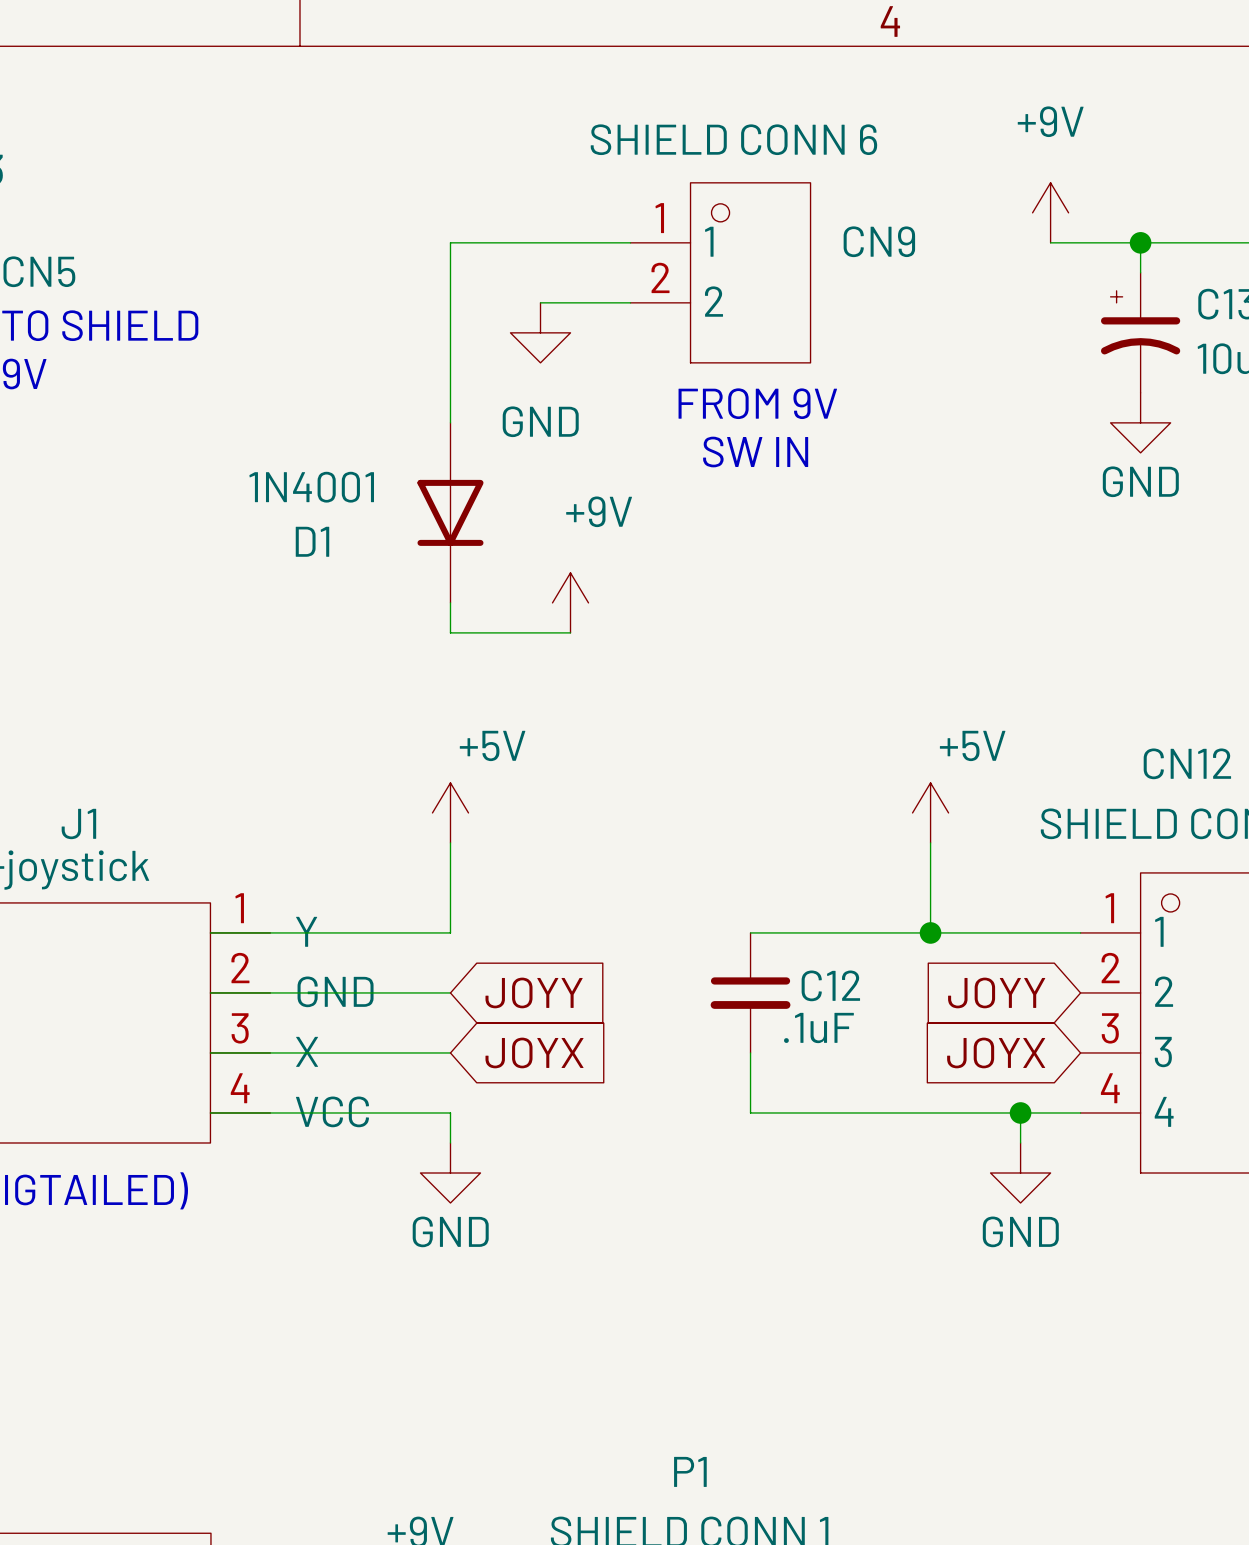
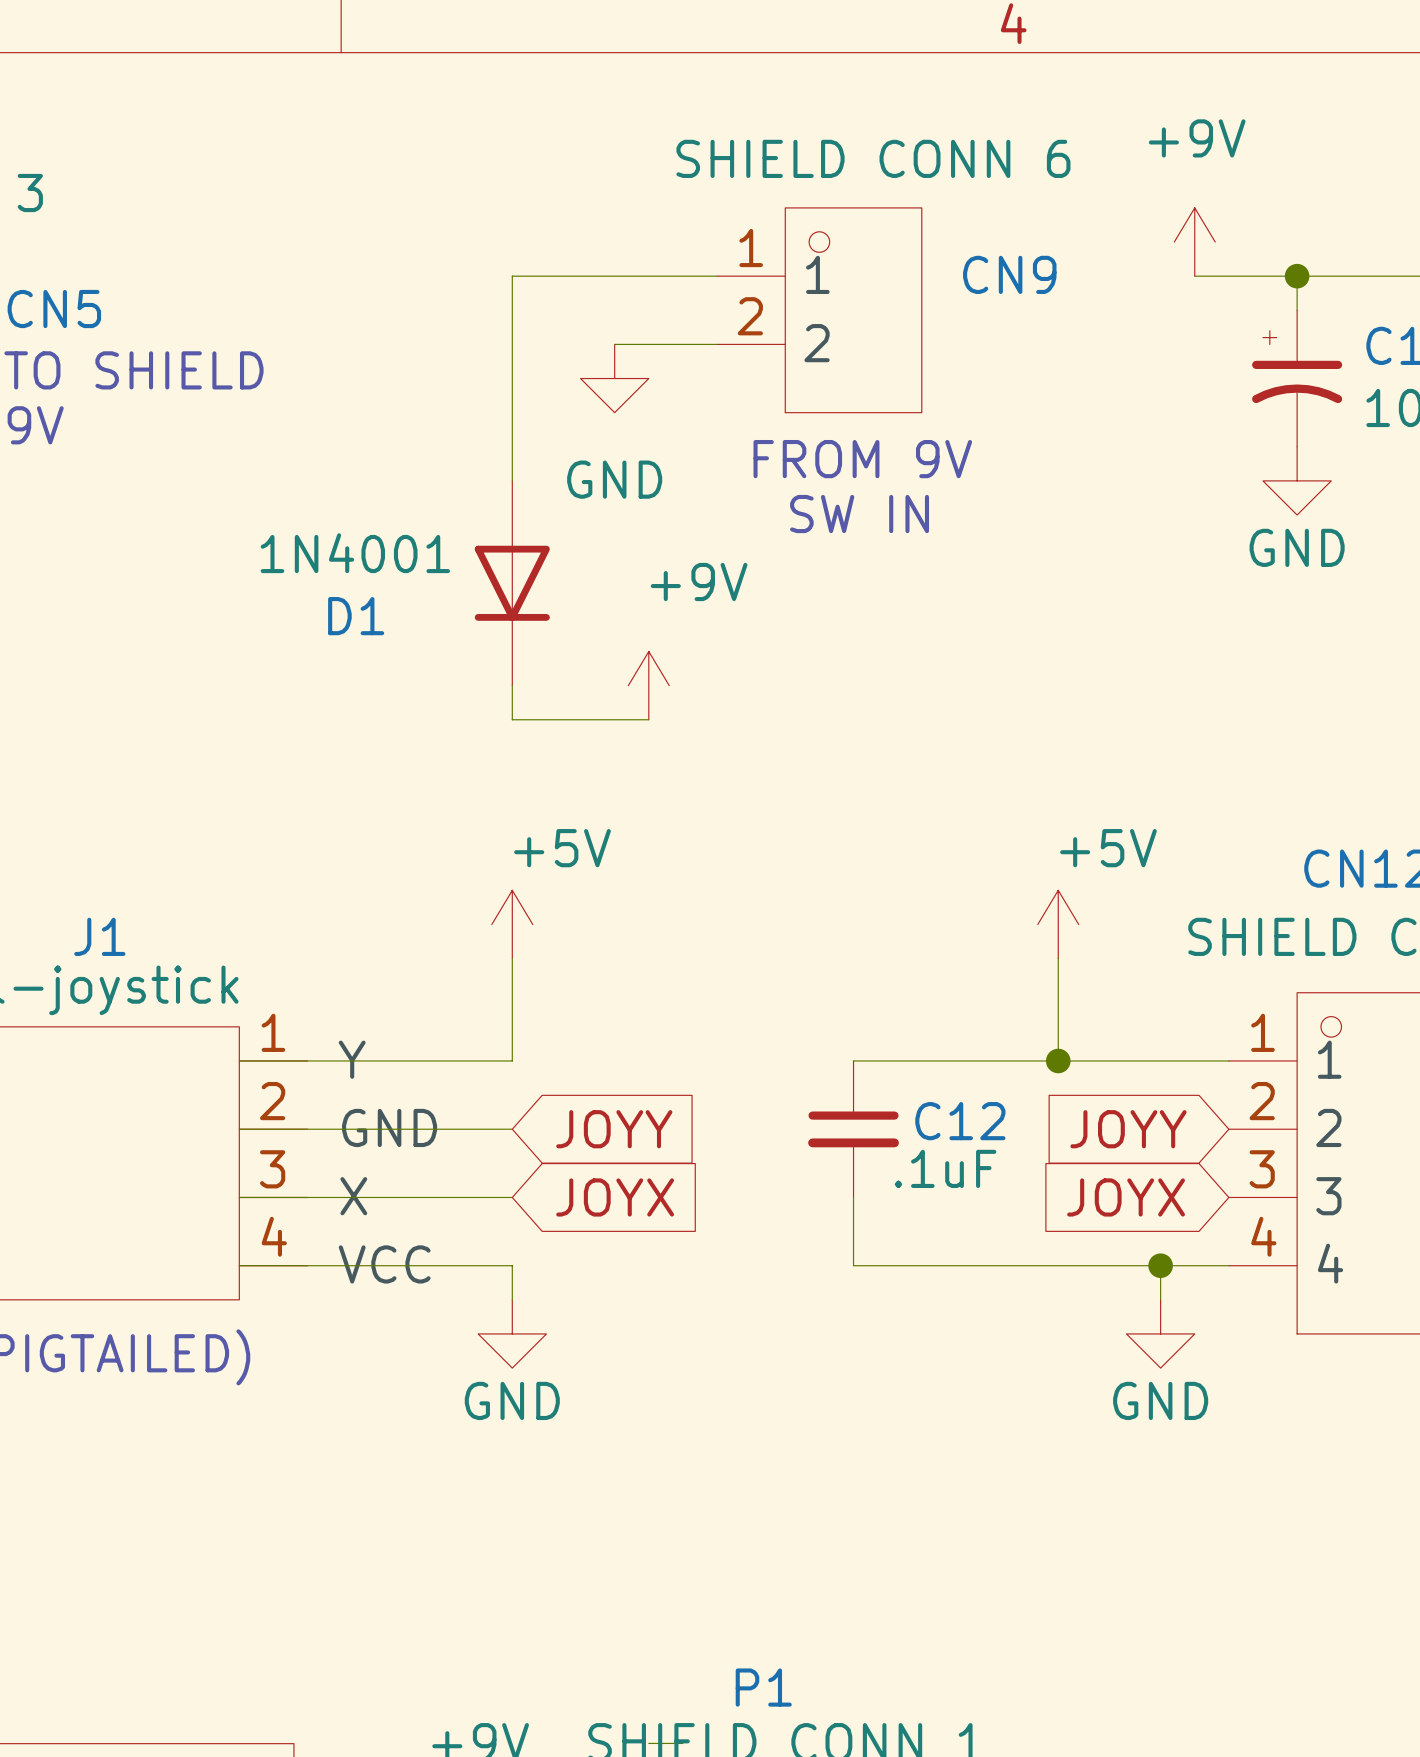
P1 name position: P1 (690, 1471) -> P1 (763, 1687)
wire: none -> (648, 1743) (682, 1743)

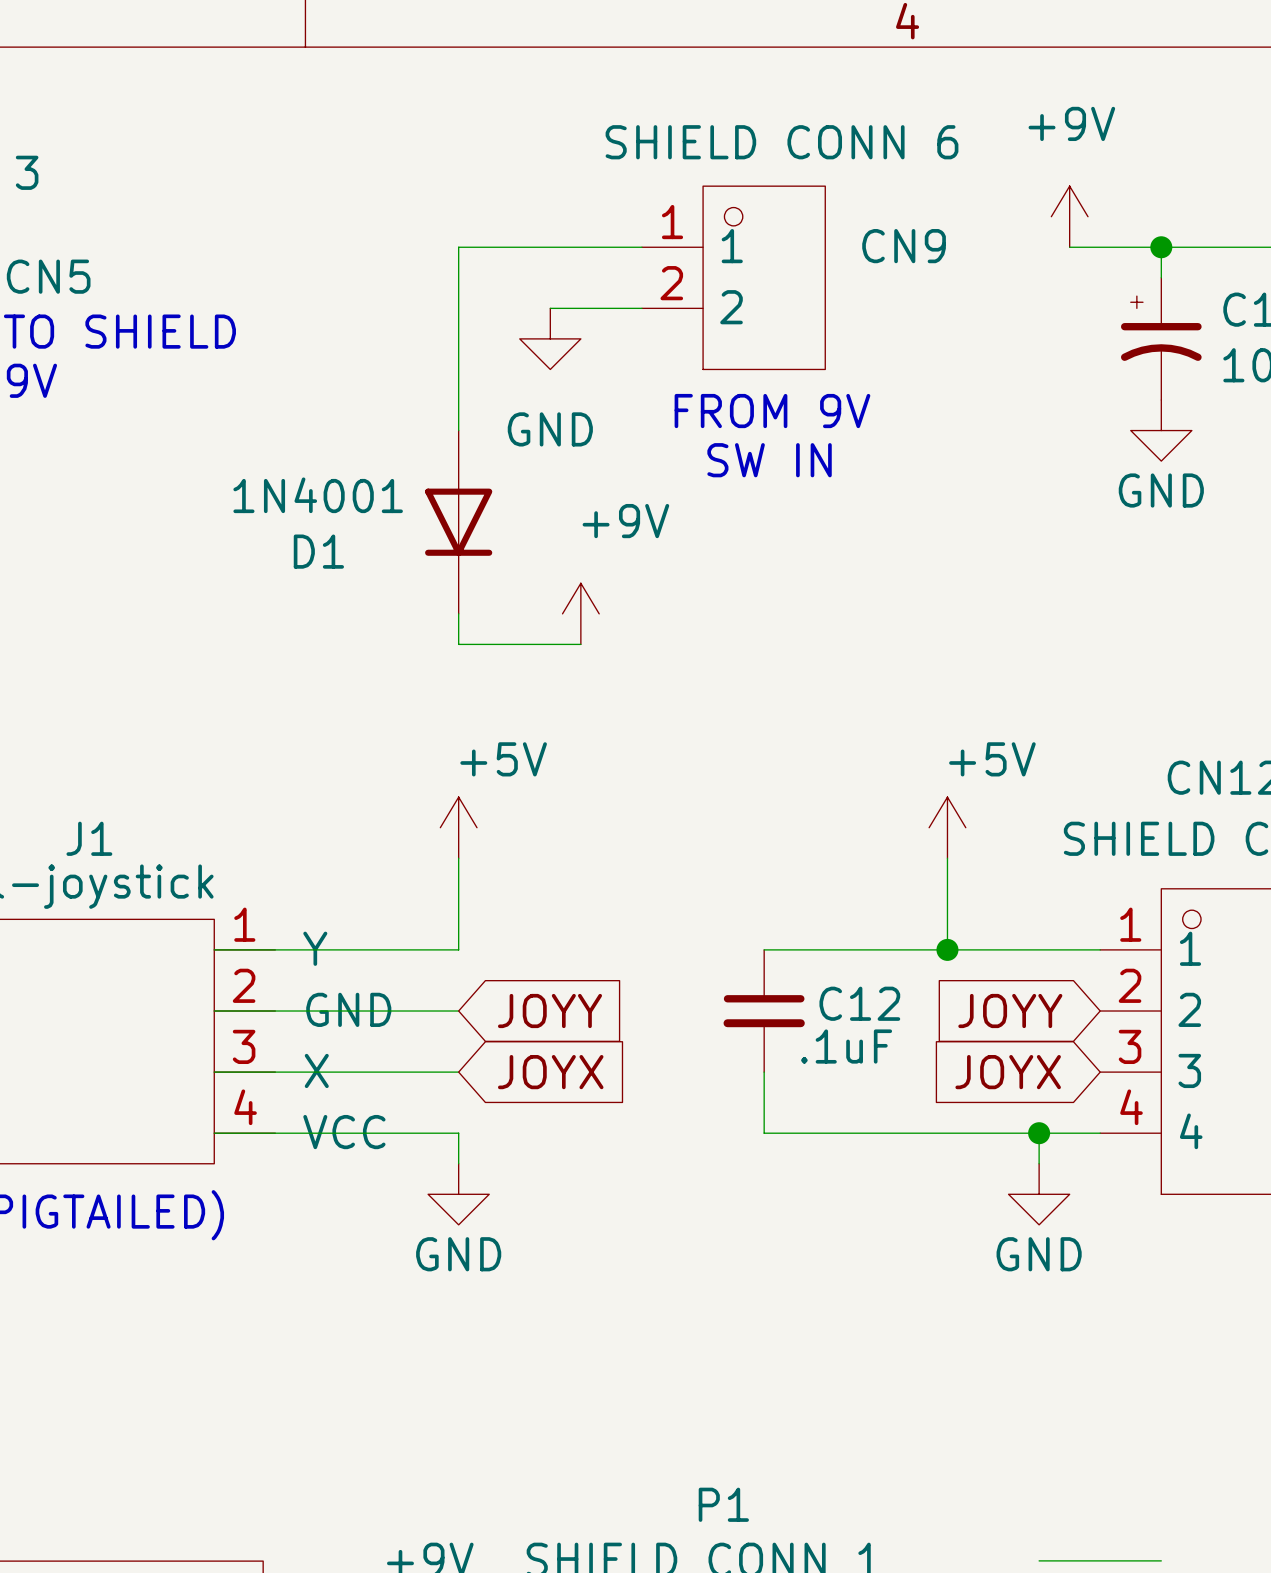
P1 name position: P1 (763, 1687) -> P1 (723, 1504)
wire: (648, 1743) (682, 1743) -> none
wire: none -> (1039, 1560) (1161, 1560)

